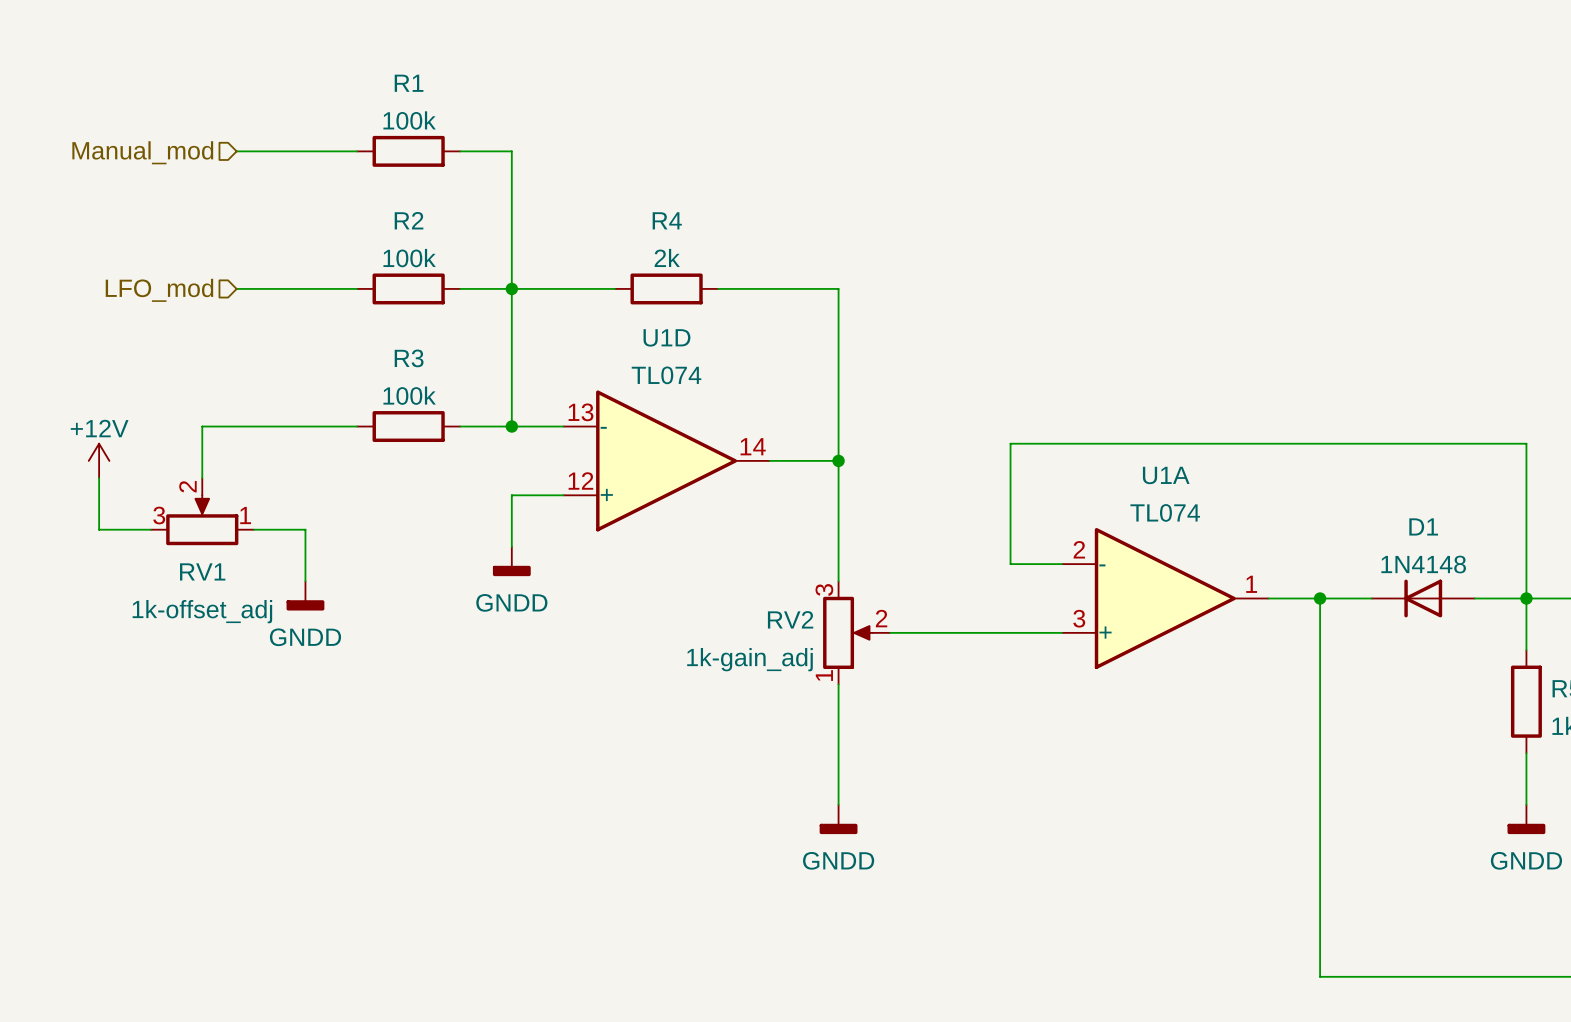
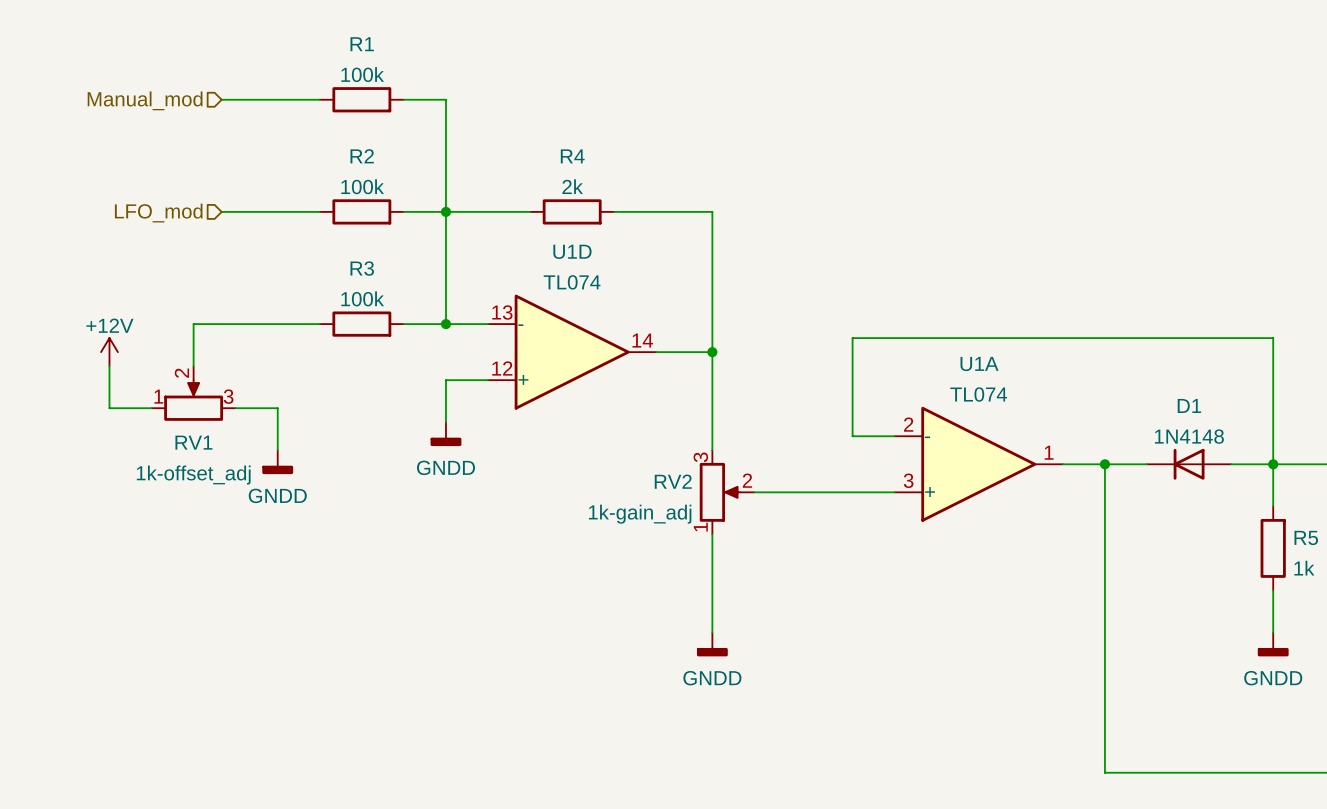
RV1 flip: as is (202, 520) -> left-right (193, 400)

